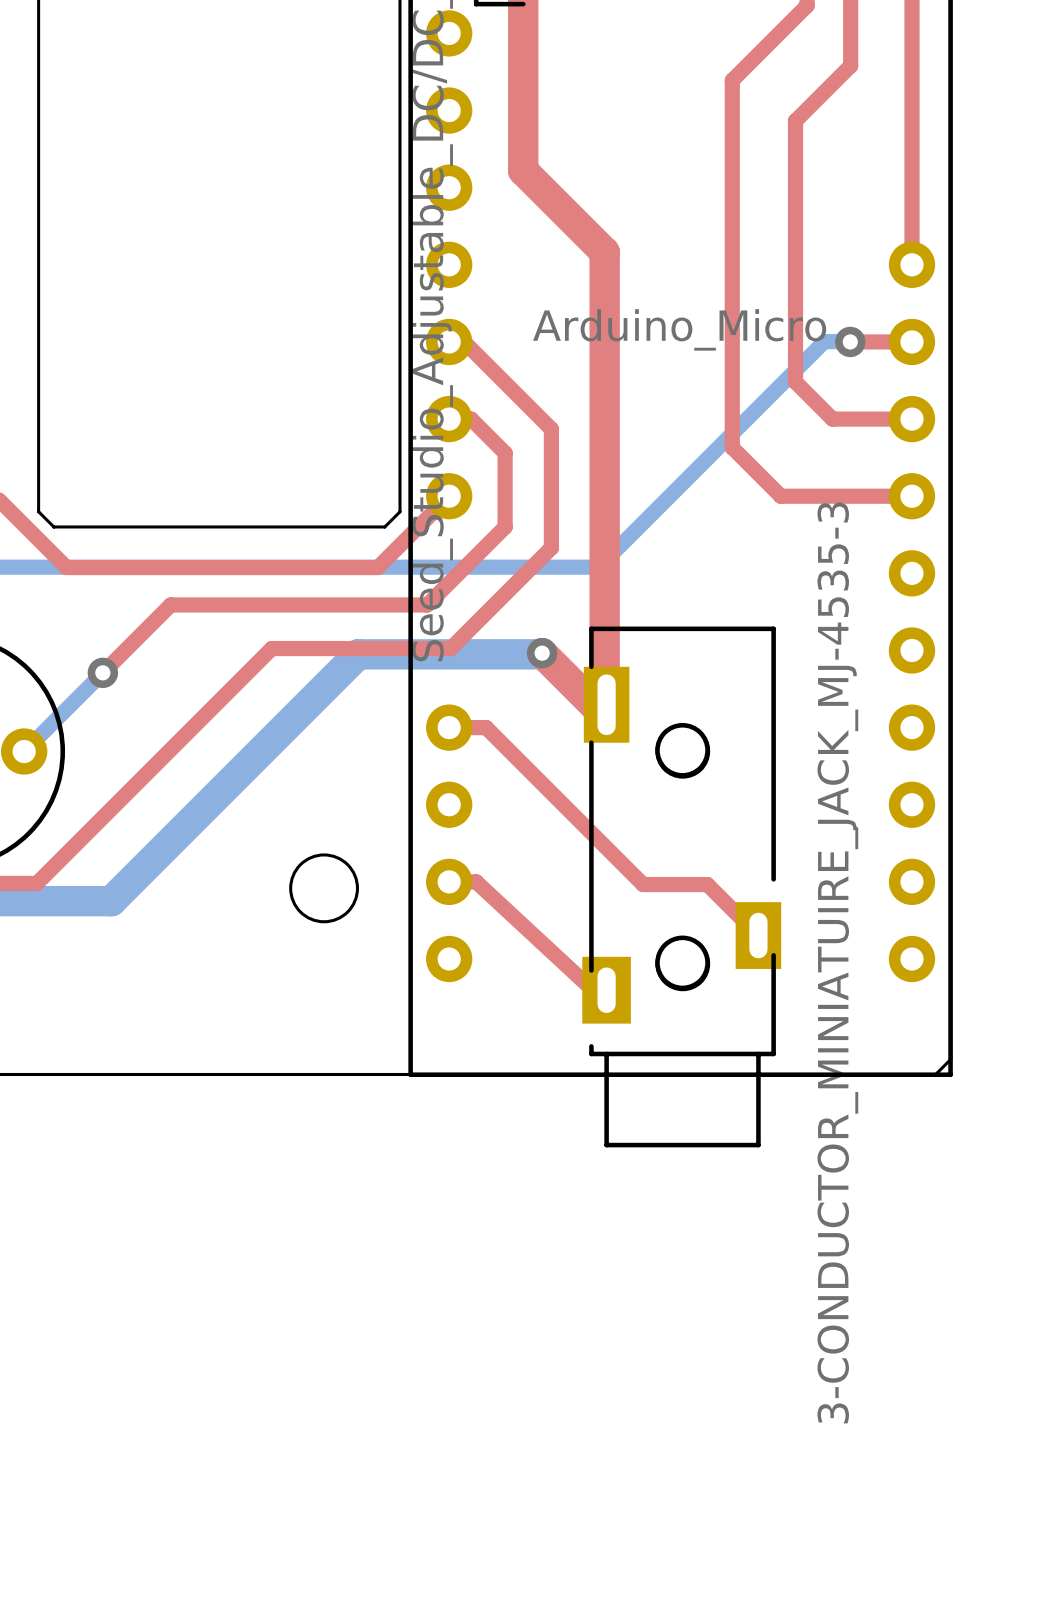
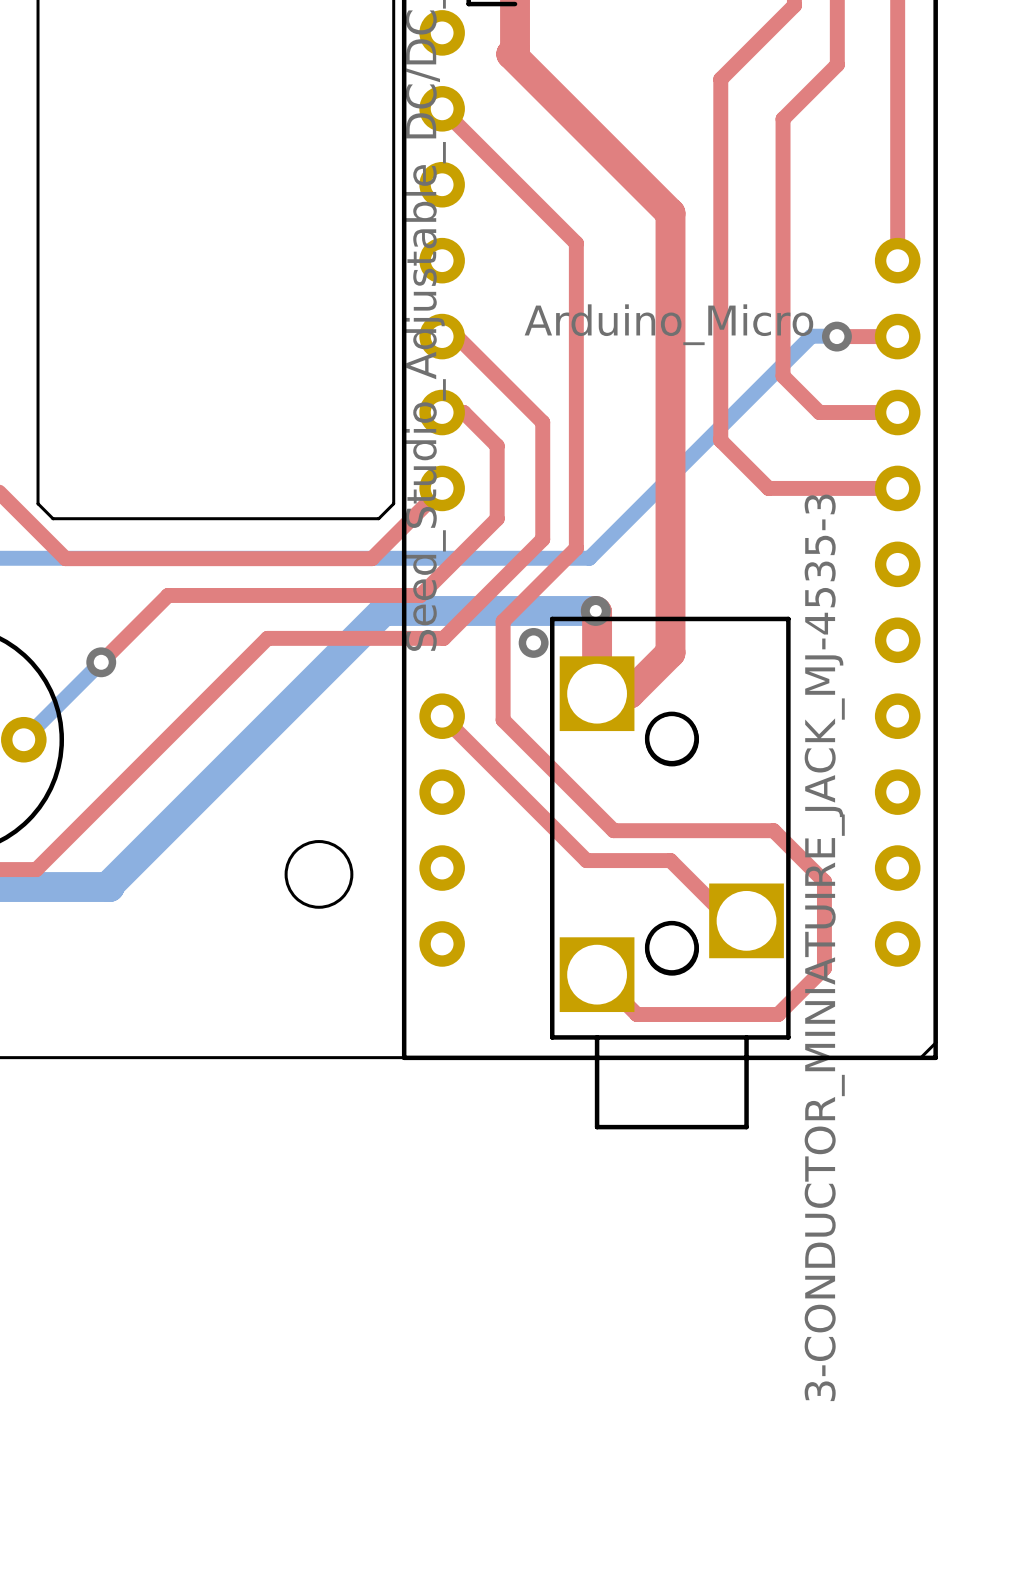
top track: (523, 51) (523, 170) (604, 252) (604, 706) (595, 706) (542, 653) -> (515, 50) (511, 54) (670, 213) (670, 652) (629, 693) (597, 693) (595, 610)
top track: none -> (442, 109) (576, 243) (576, 548) (503, 621) (503, 720) (613, 830) (773, 830) (824, 881) (824, 968) (778, 1014) (636, 1014) (597, 974)
via: none -> (595, 610)
part footprint: [582, 626, 782, 1148] -> [550, 616, 791, 1130]
bottom track: (542, 653) (358, 654) (111, 901) -> (595, 610) (383, 610) (109, 887)
top track: (449, 727) (486, 727) (643, 884) (707, 884) (758, 935) -> (442, 716) (586, 860) (670, 860) (730, 920) (746, 920)
top track: (449, 881) (476, 881) (604, 1000) -> none

